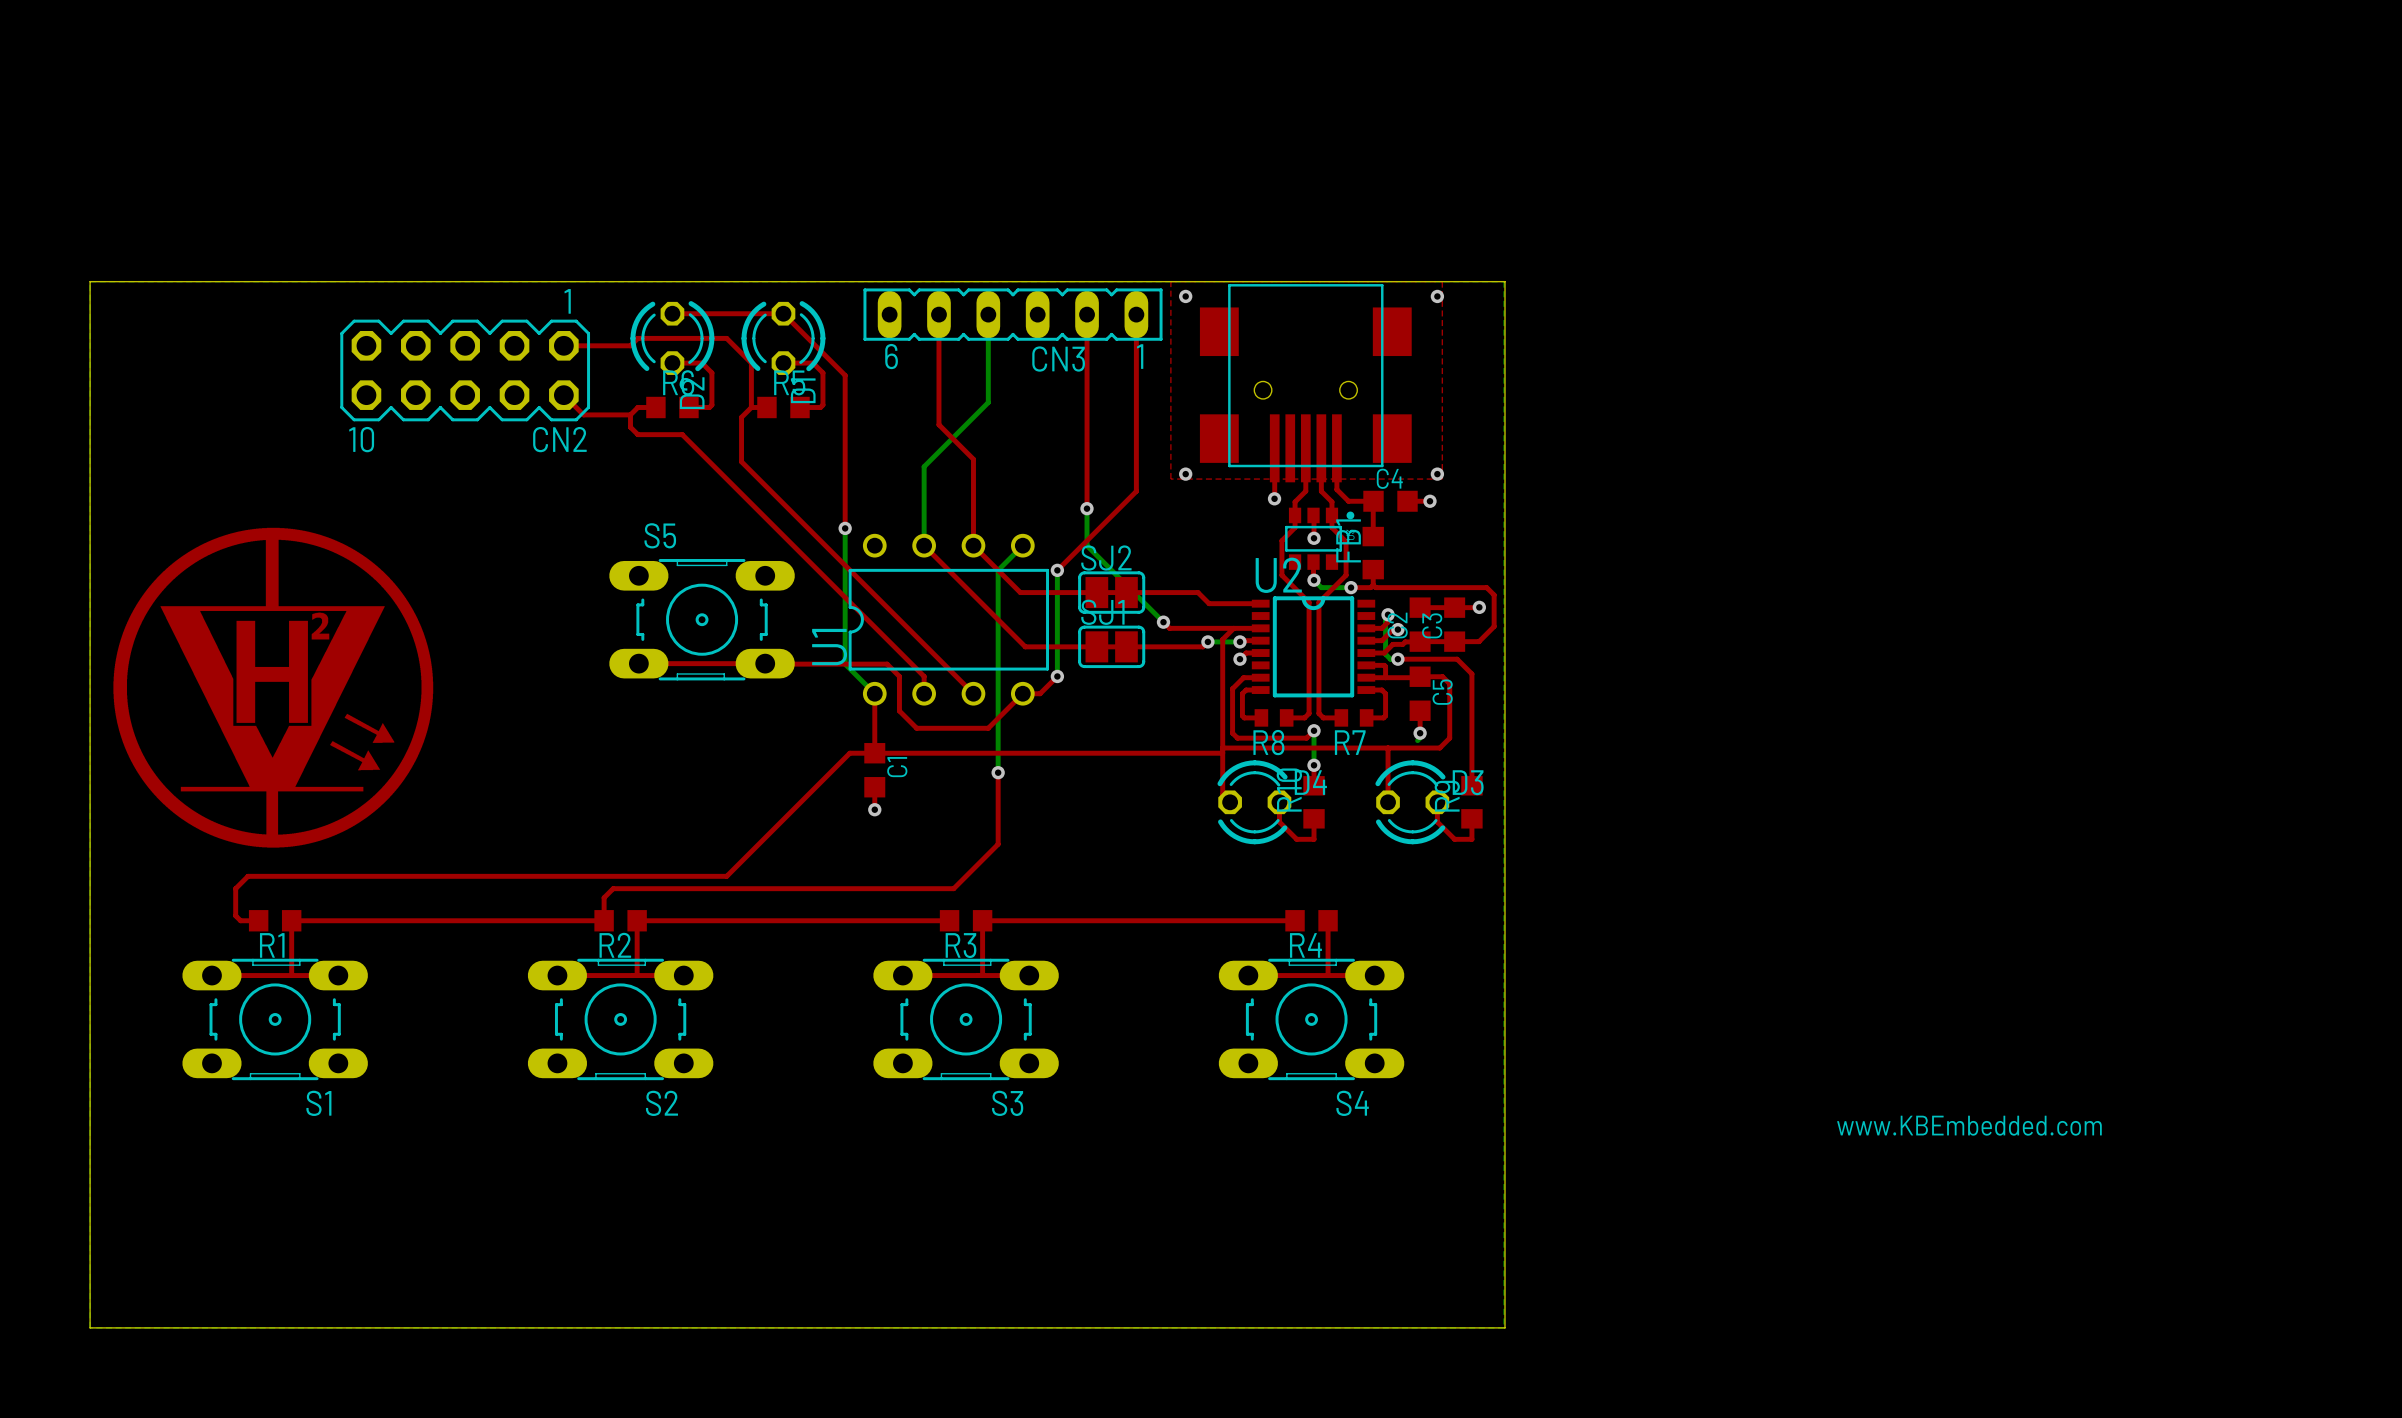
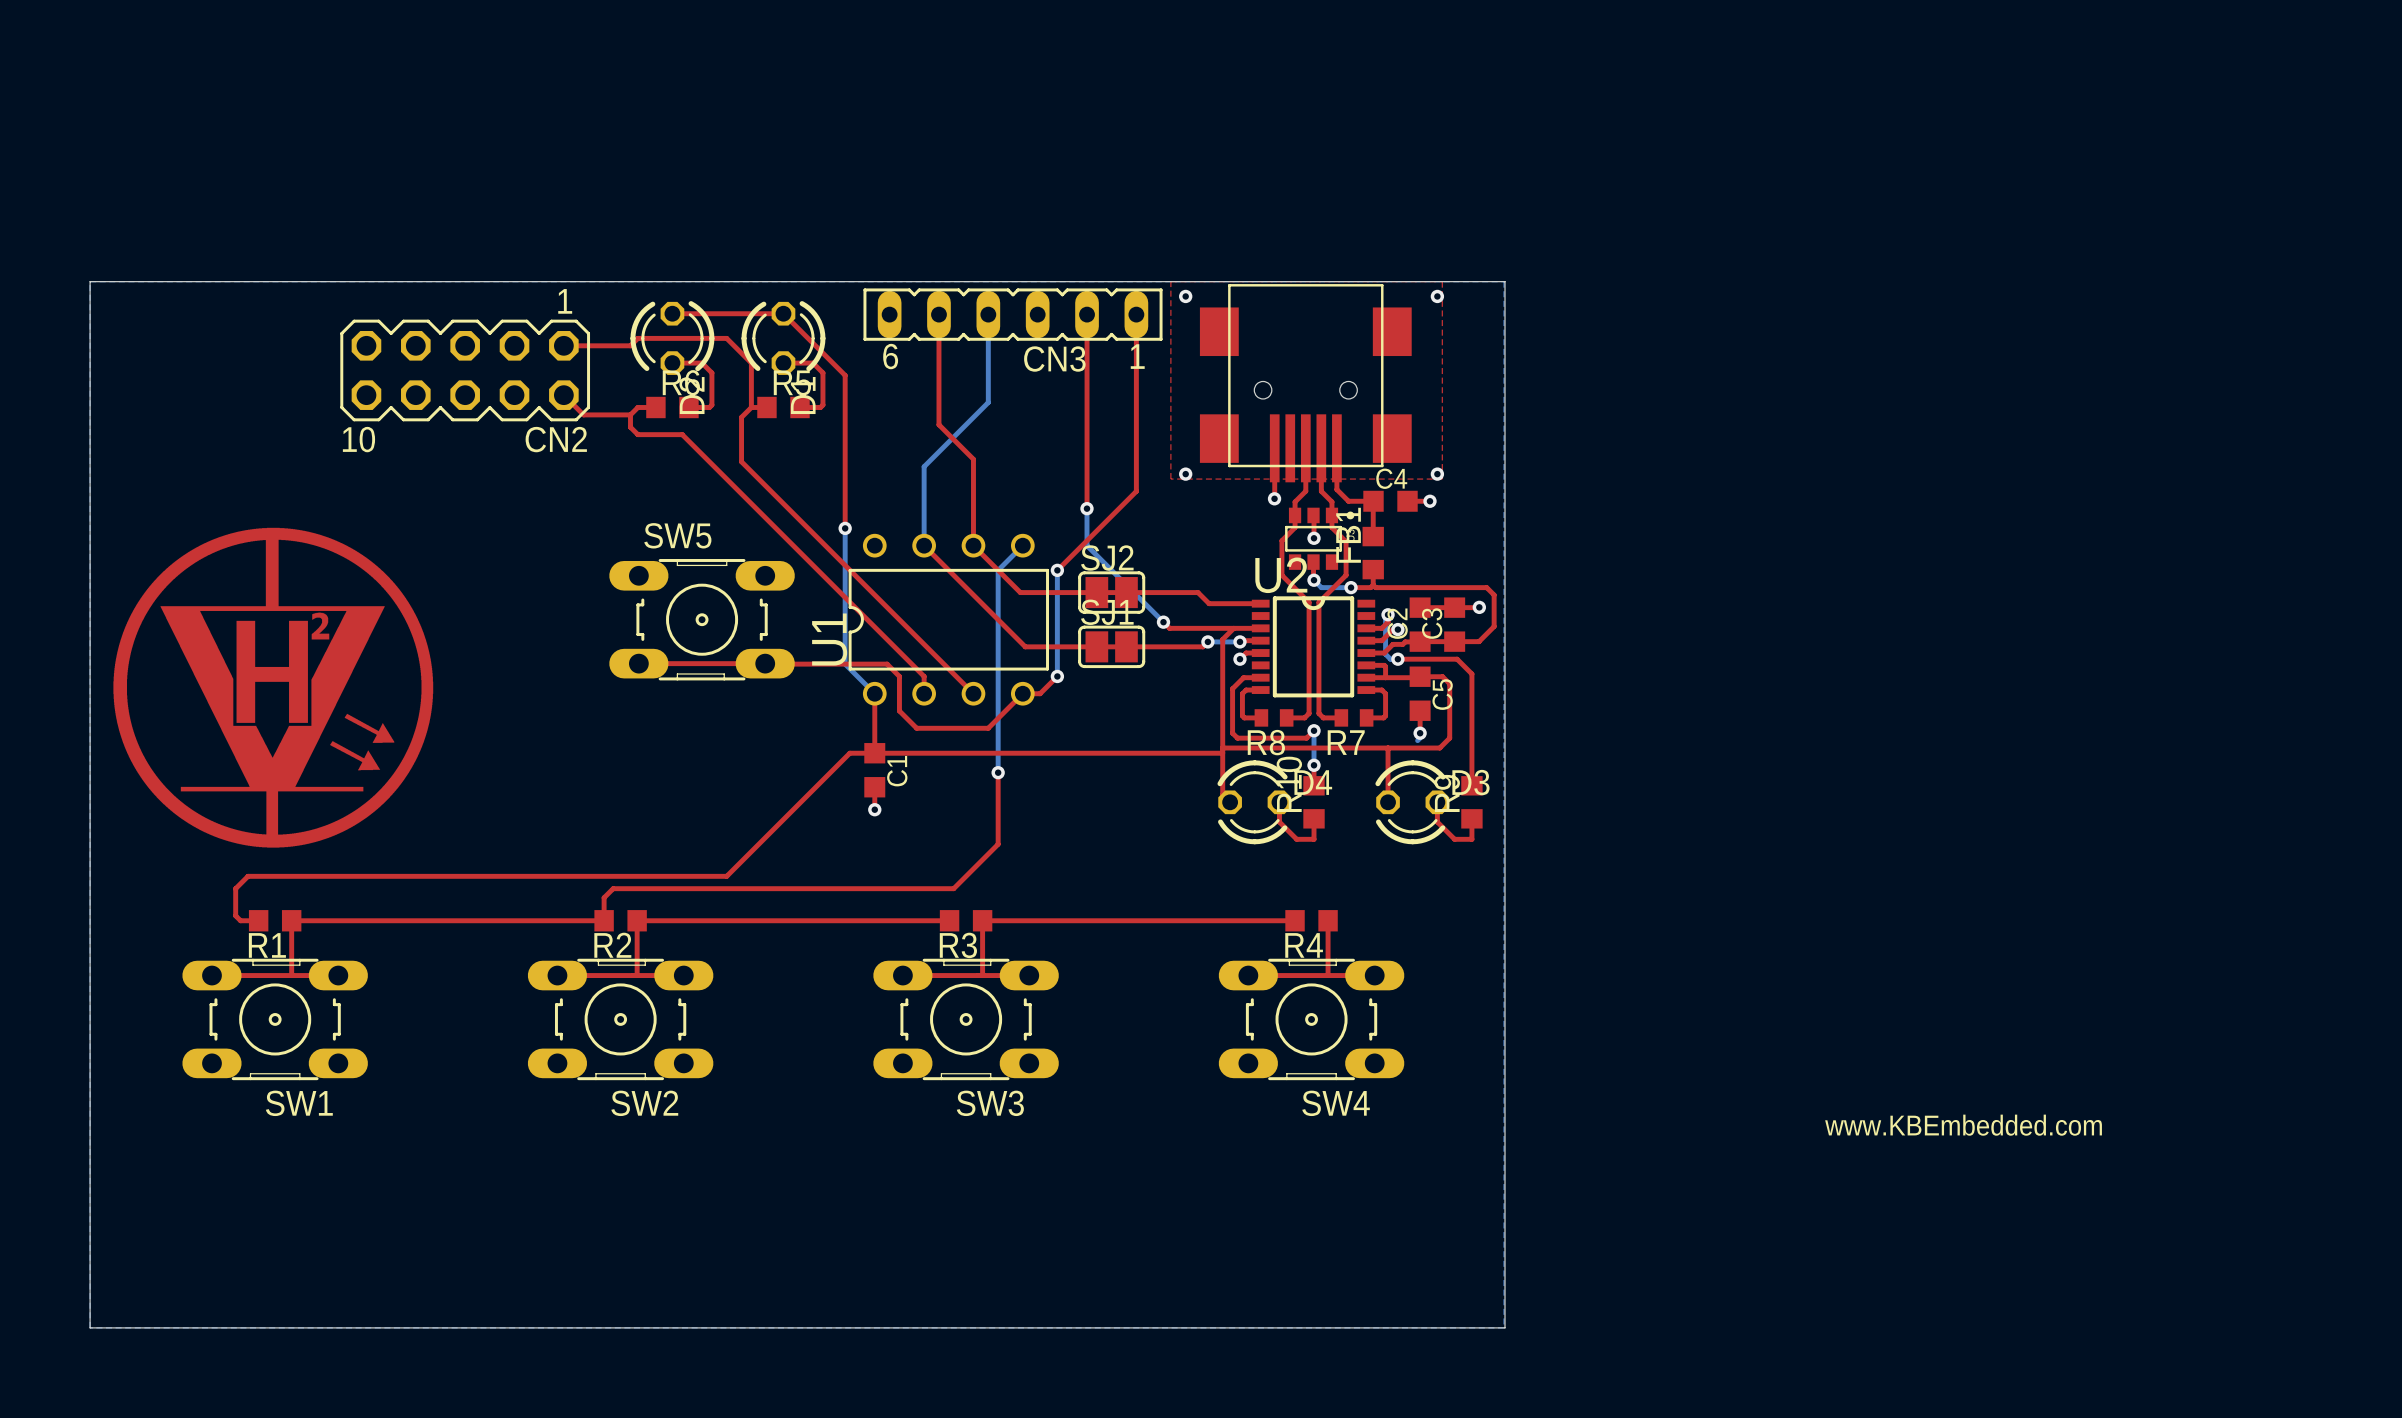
S5 name: S5 (660, 535) -> SW5 (677, 535)
S1 name: S1 (318, 1103) -> SW1 (299, 1103)
S2 name: S2 (661, 1103) -> SW2 (644, 1103)
S3 name: S3 (1007, 1103) -> SW3 (990, 1103)
S4 name: S4 (1352, 1103) -> SW4 (1336, 1103)

